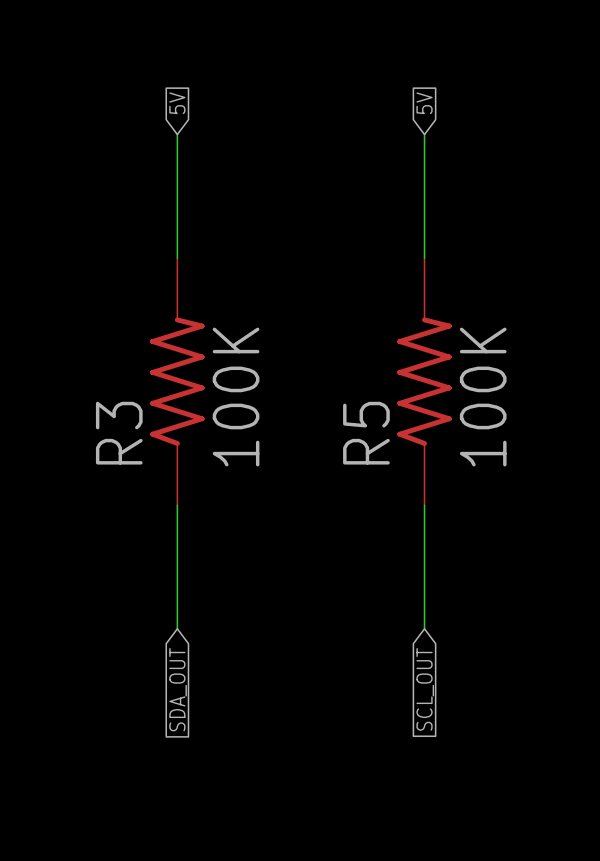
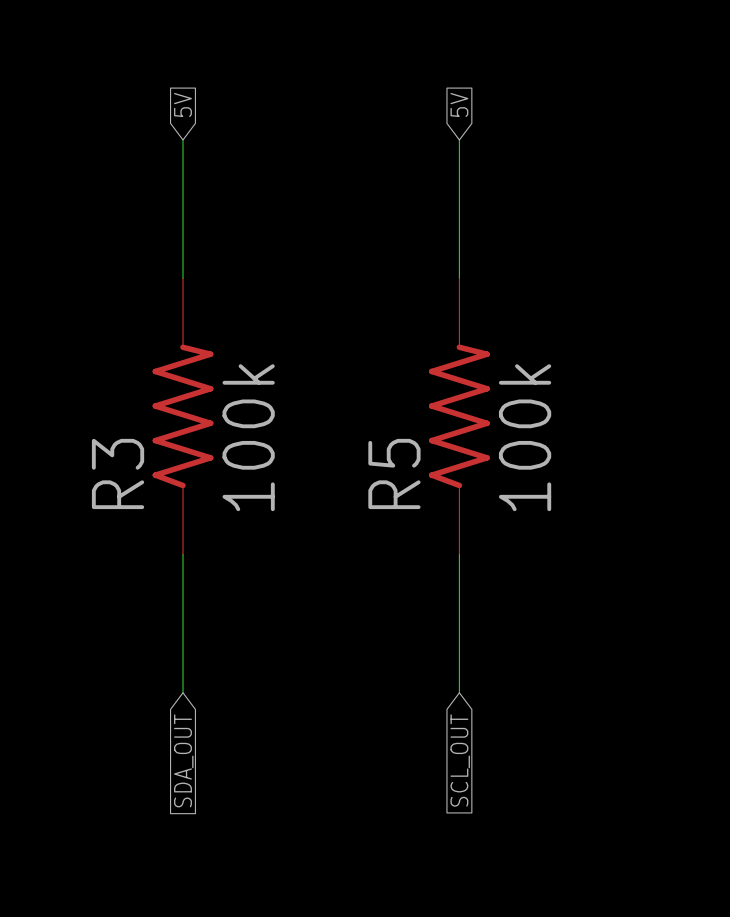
R3 value: 100K (236, 397) -> 100k (248, 437)
R5 value: 100K (483, 397) -> 100k (525, 437)

